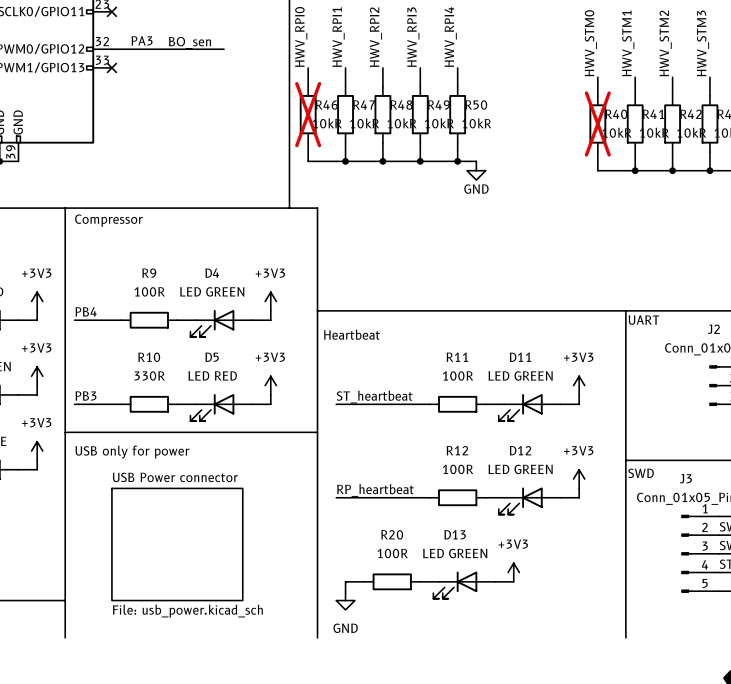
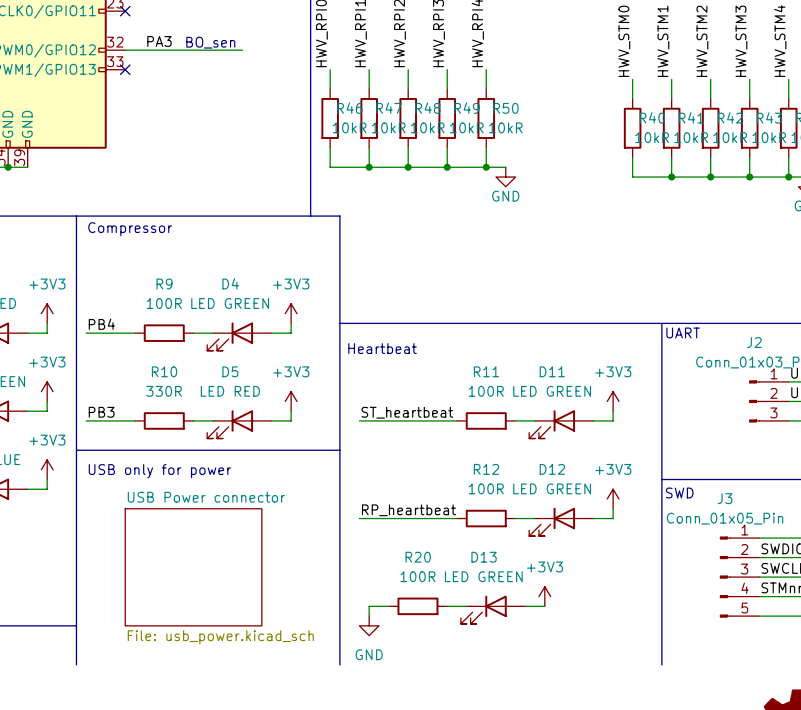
R46 do-not-place cross: (308, 114) -> none
R40 do-not-place cross: (597, 123) -> none

